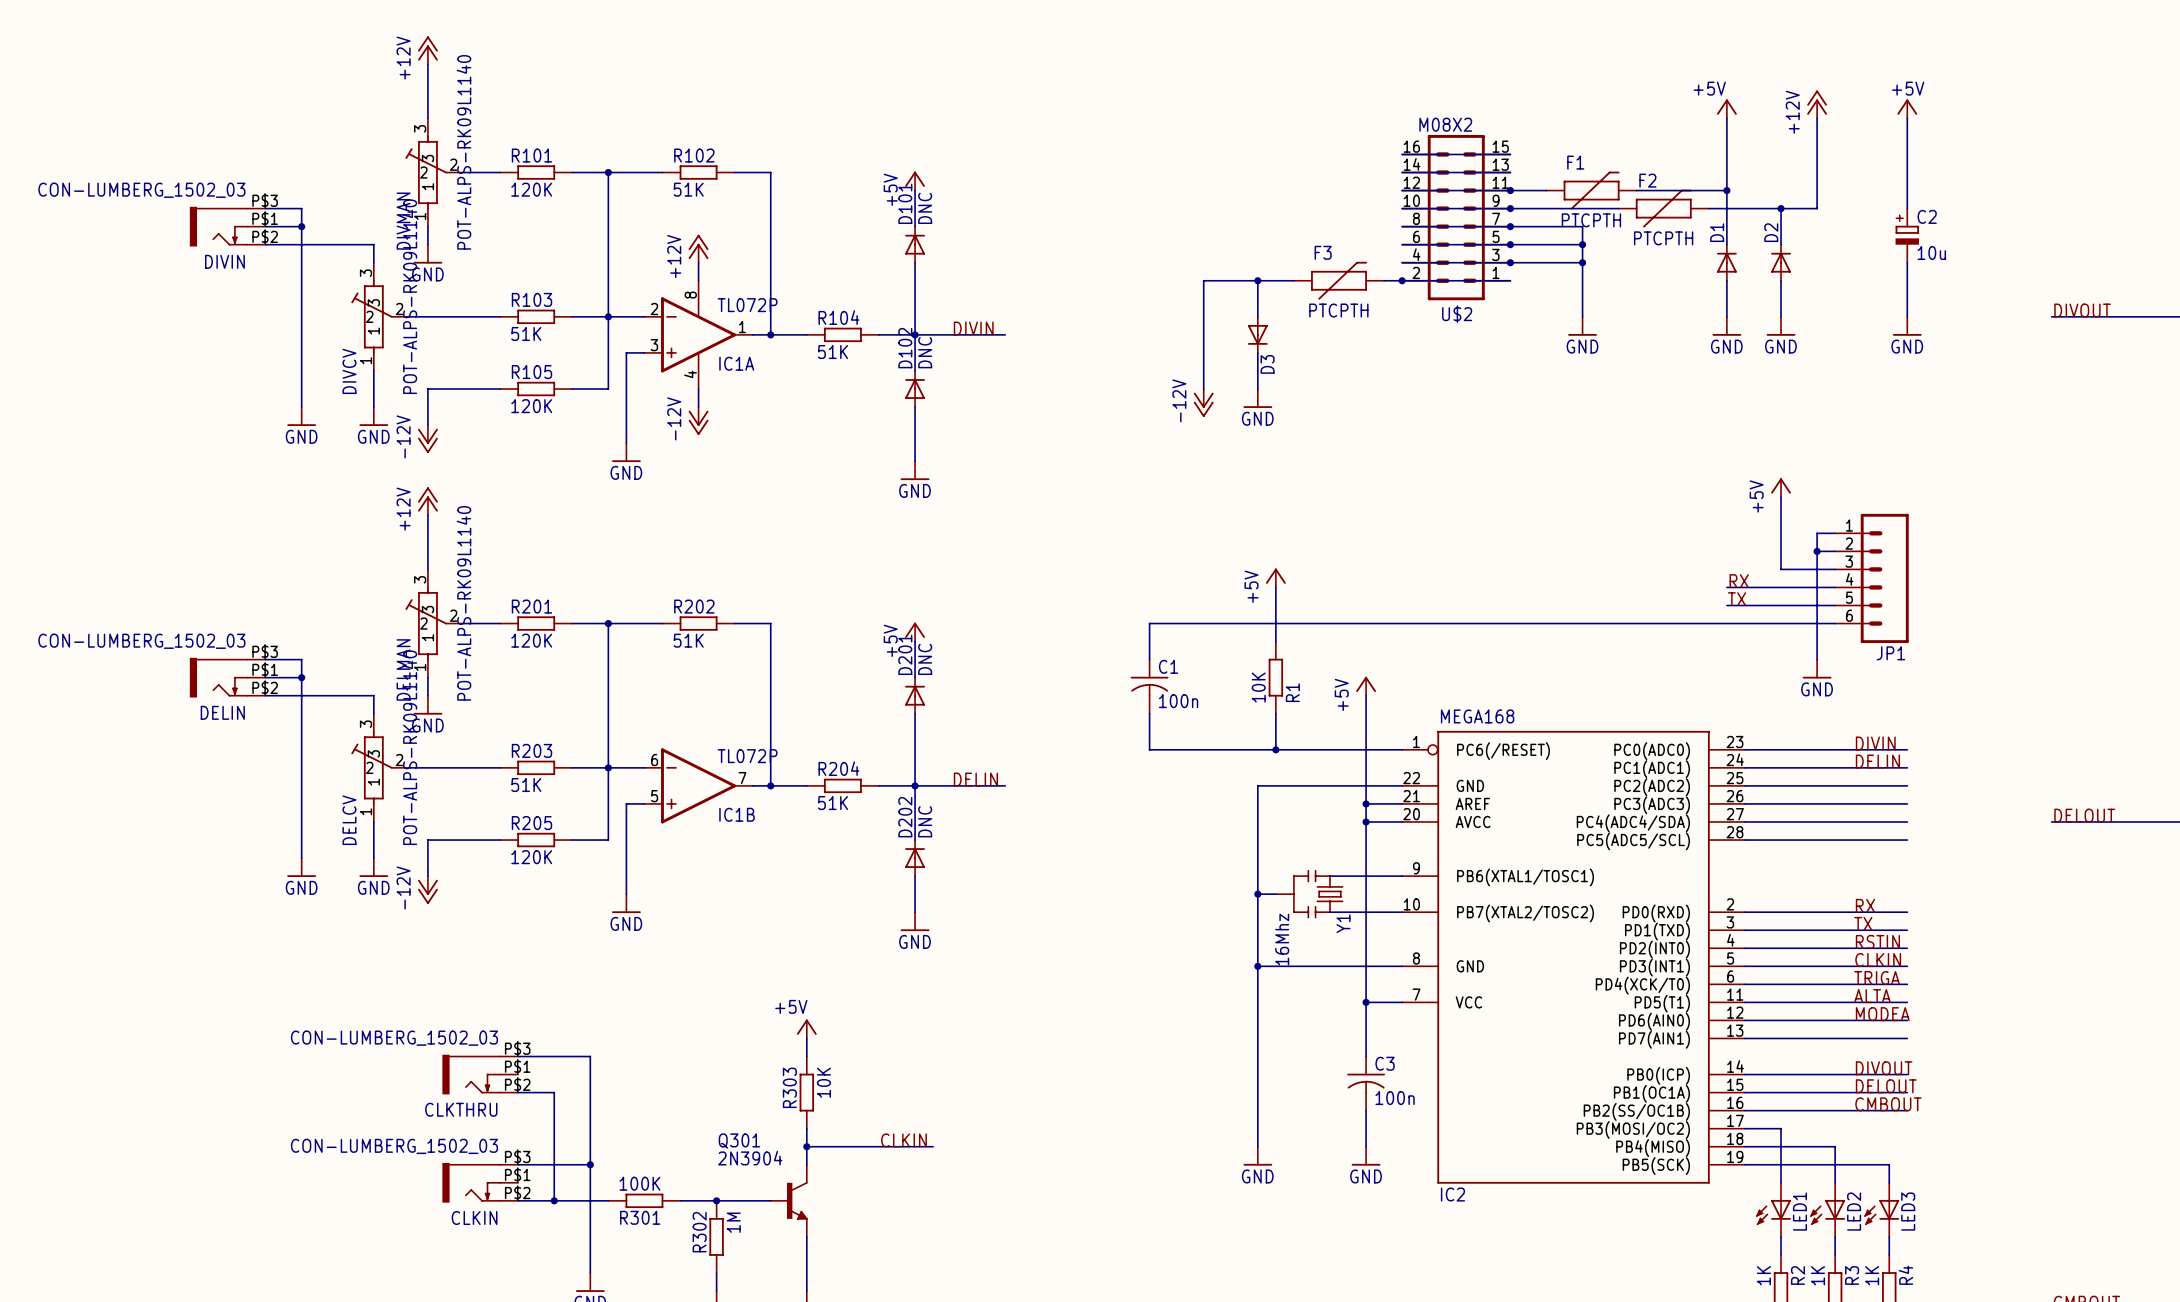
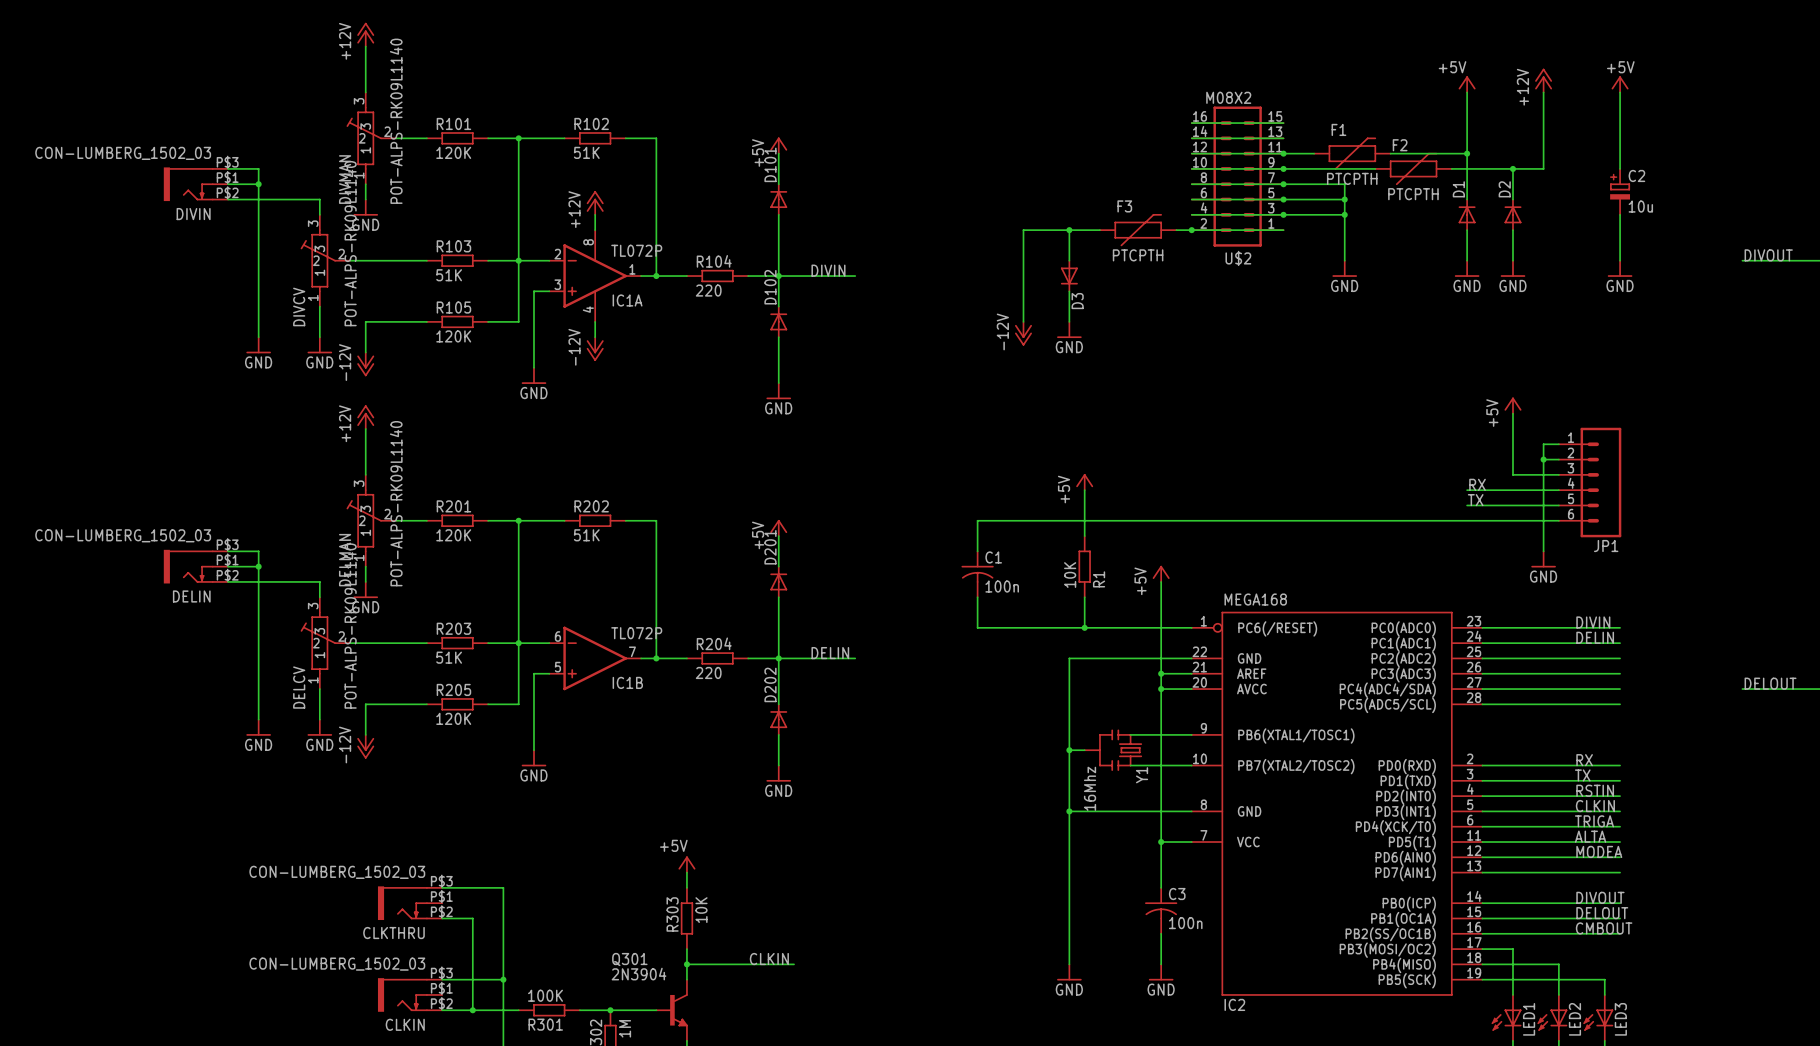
D101 value: DNC (925, 208) -> none
R104 value: 51K (833, 352) -> 220 (708, 290)
D102 value: DNC (925, 352) -> none
D201 value: DNC (925, 659) -> none
R204 value: 51K (833, 803) -> 220 (708, 672)
D202 value: DNC (925, 821) -> none

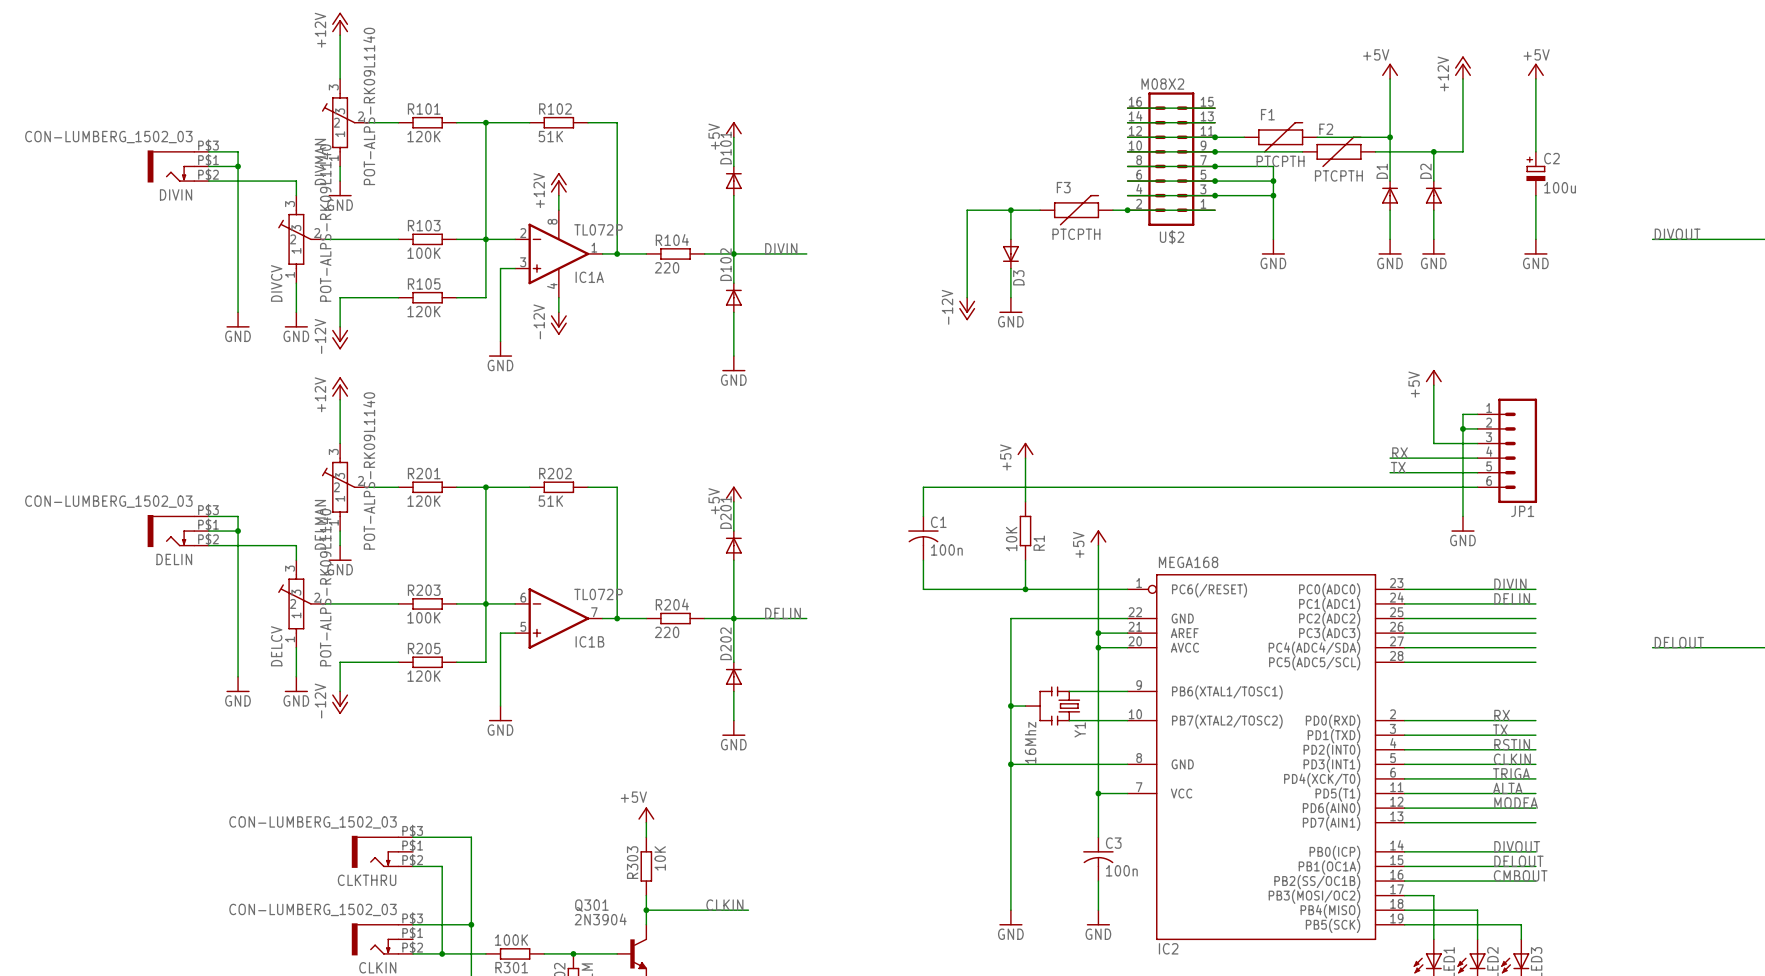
C2 value: 10u (1640, 206) -> 100u (1560, 187)
R103 value: 51K (449, 275) -> 100K (423, 253)
R203 value: 51K (449, 657) -> 100K (423, 617)

